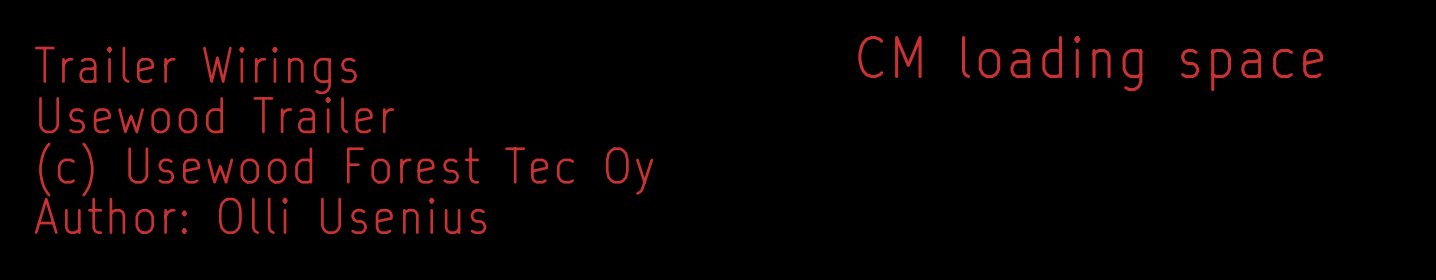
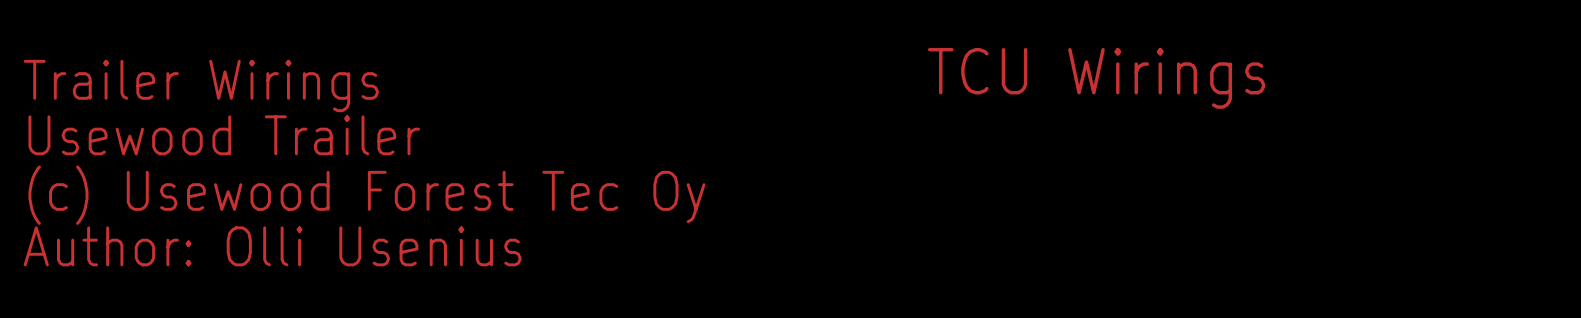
text: CM loading space (1090, 63) -> TCU Wirings (1096, 78)

